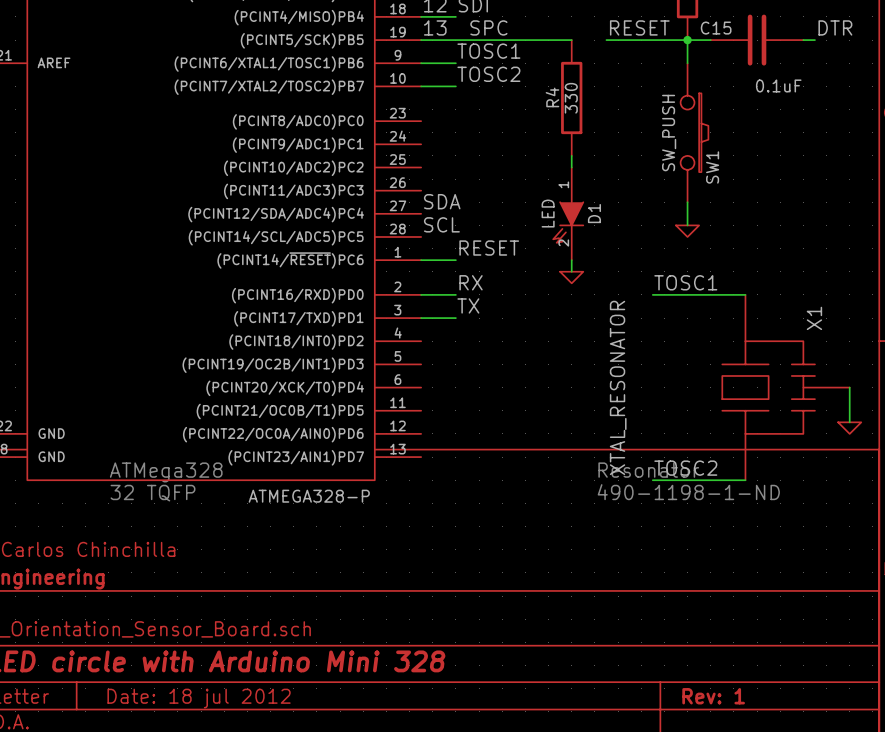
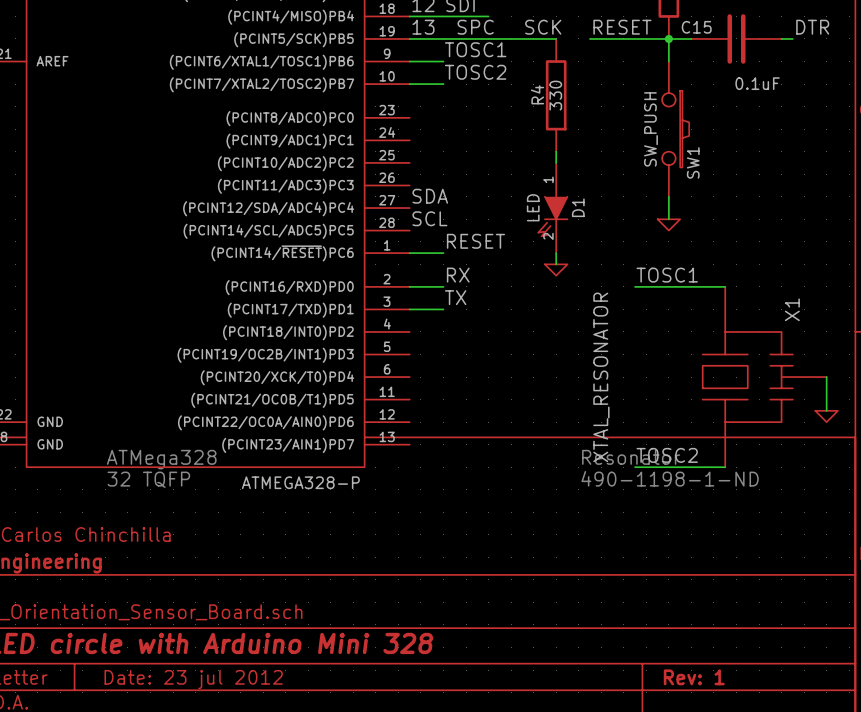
wire: none -> (443, 16) (488, 16)
label: none -> SCK (543, 27)
title block: Date: 18 jul 2012 (199, 698) -> Date: 23 jul 2012 (193, 679)

